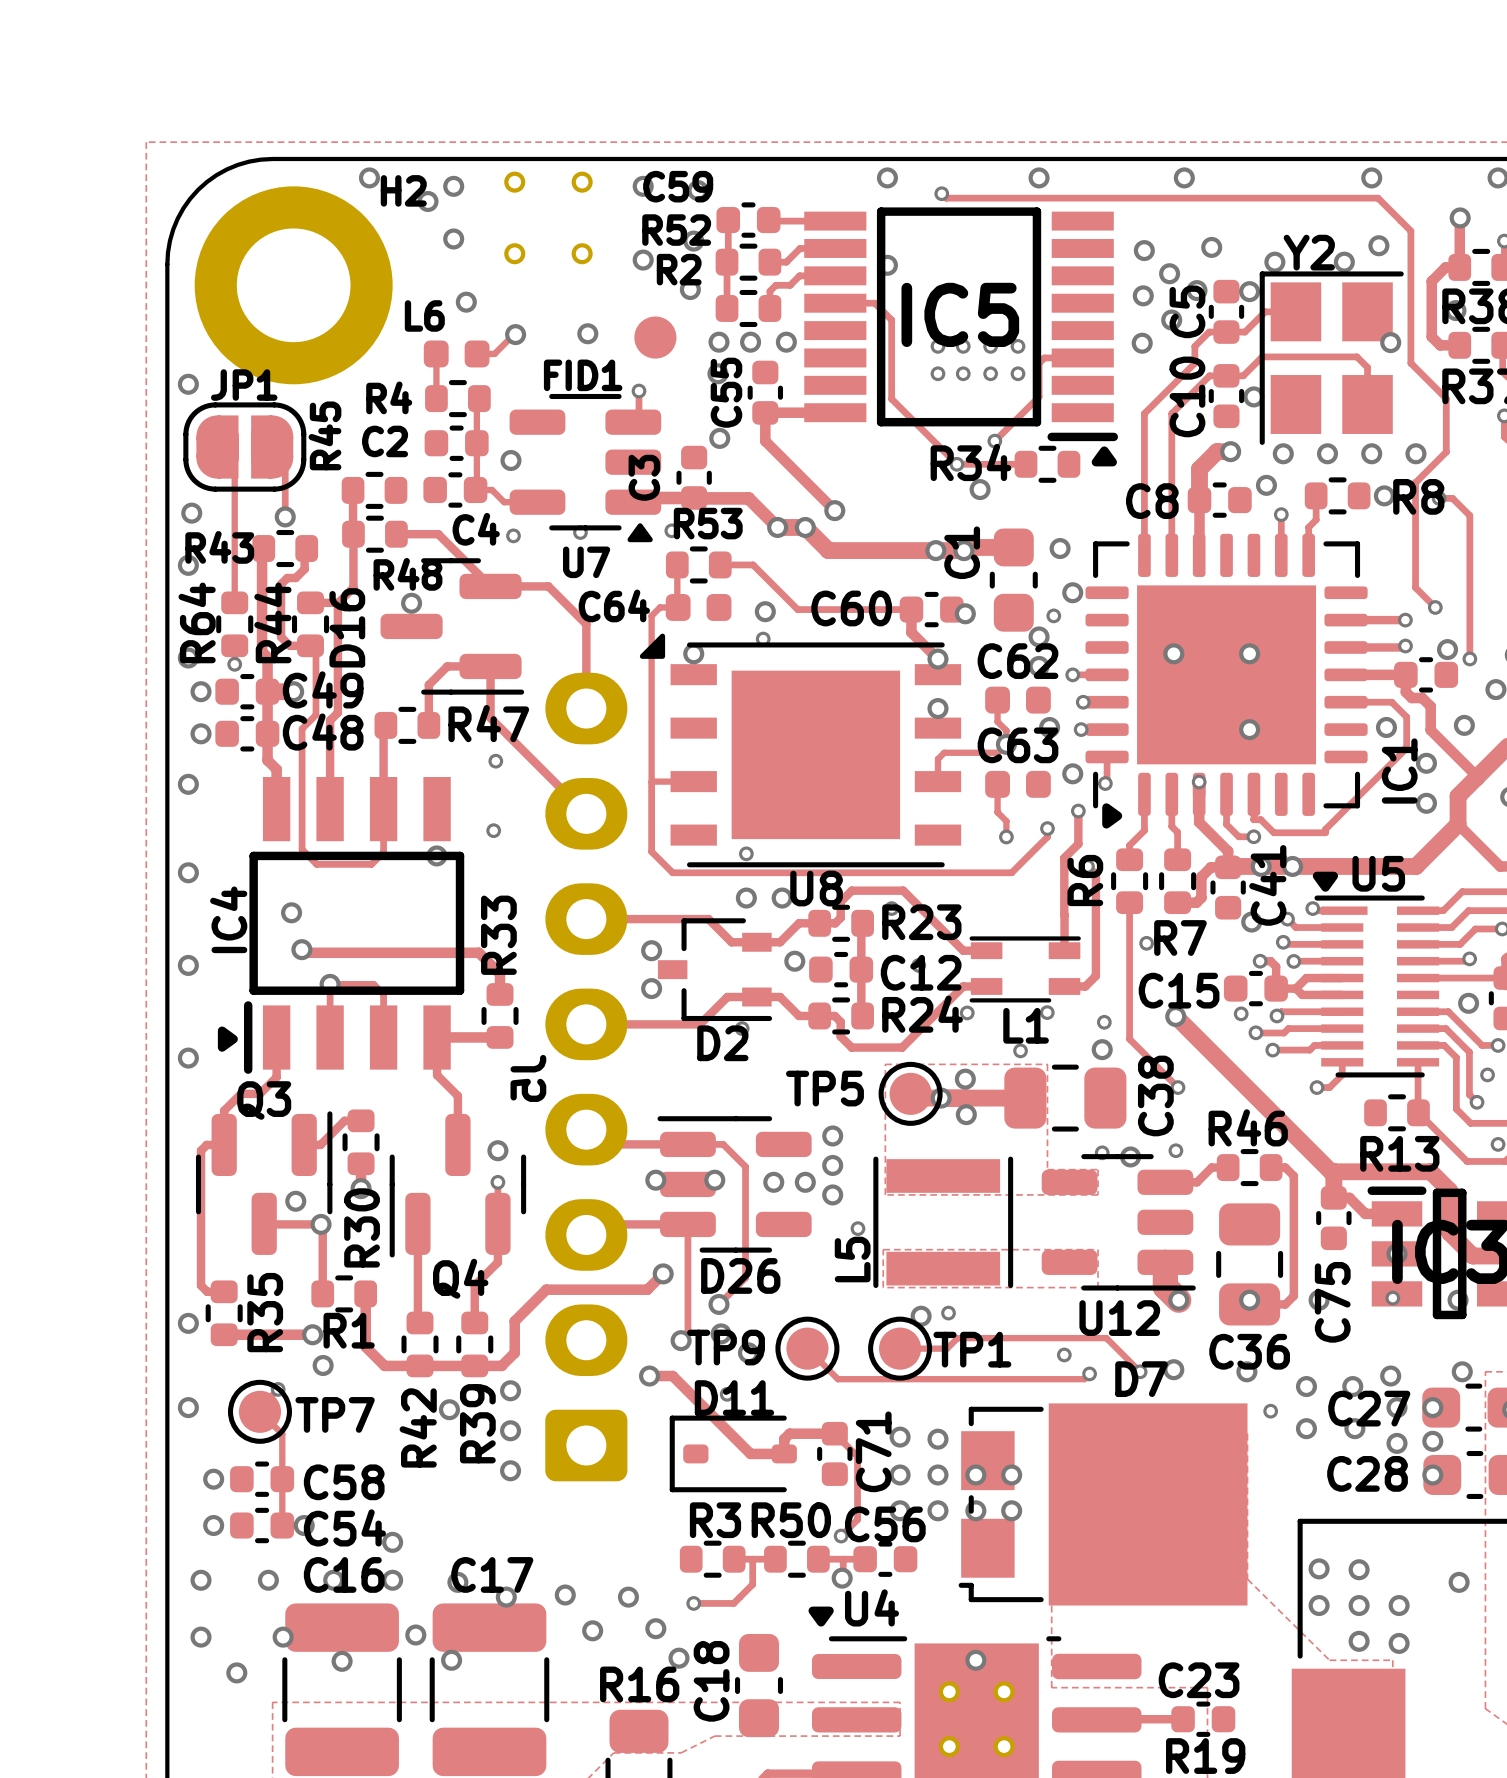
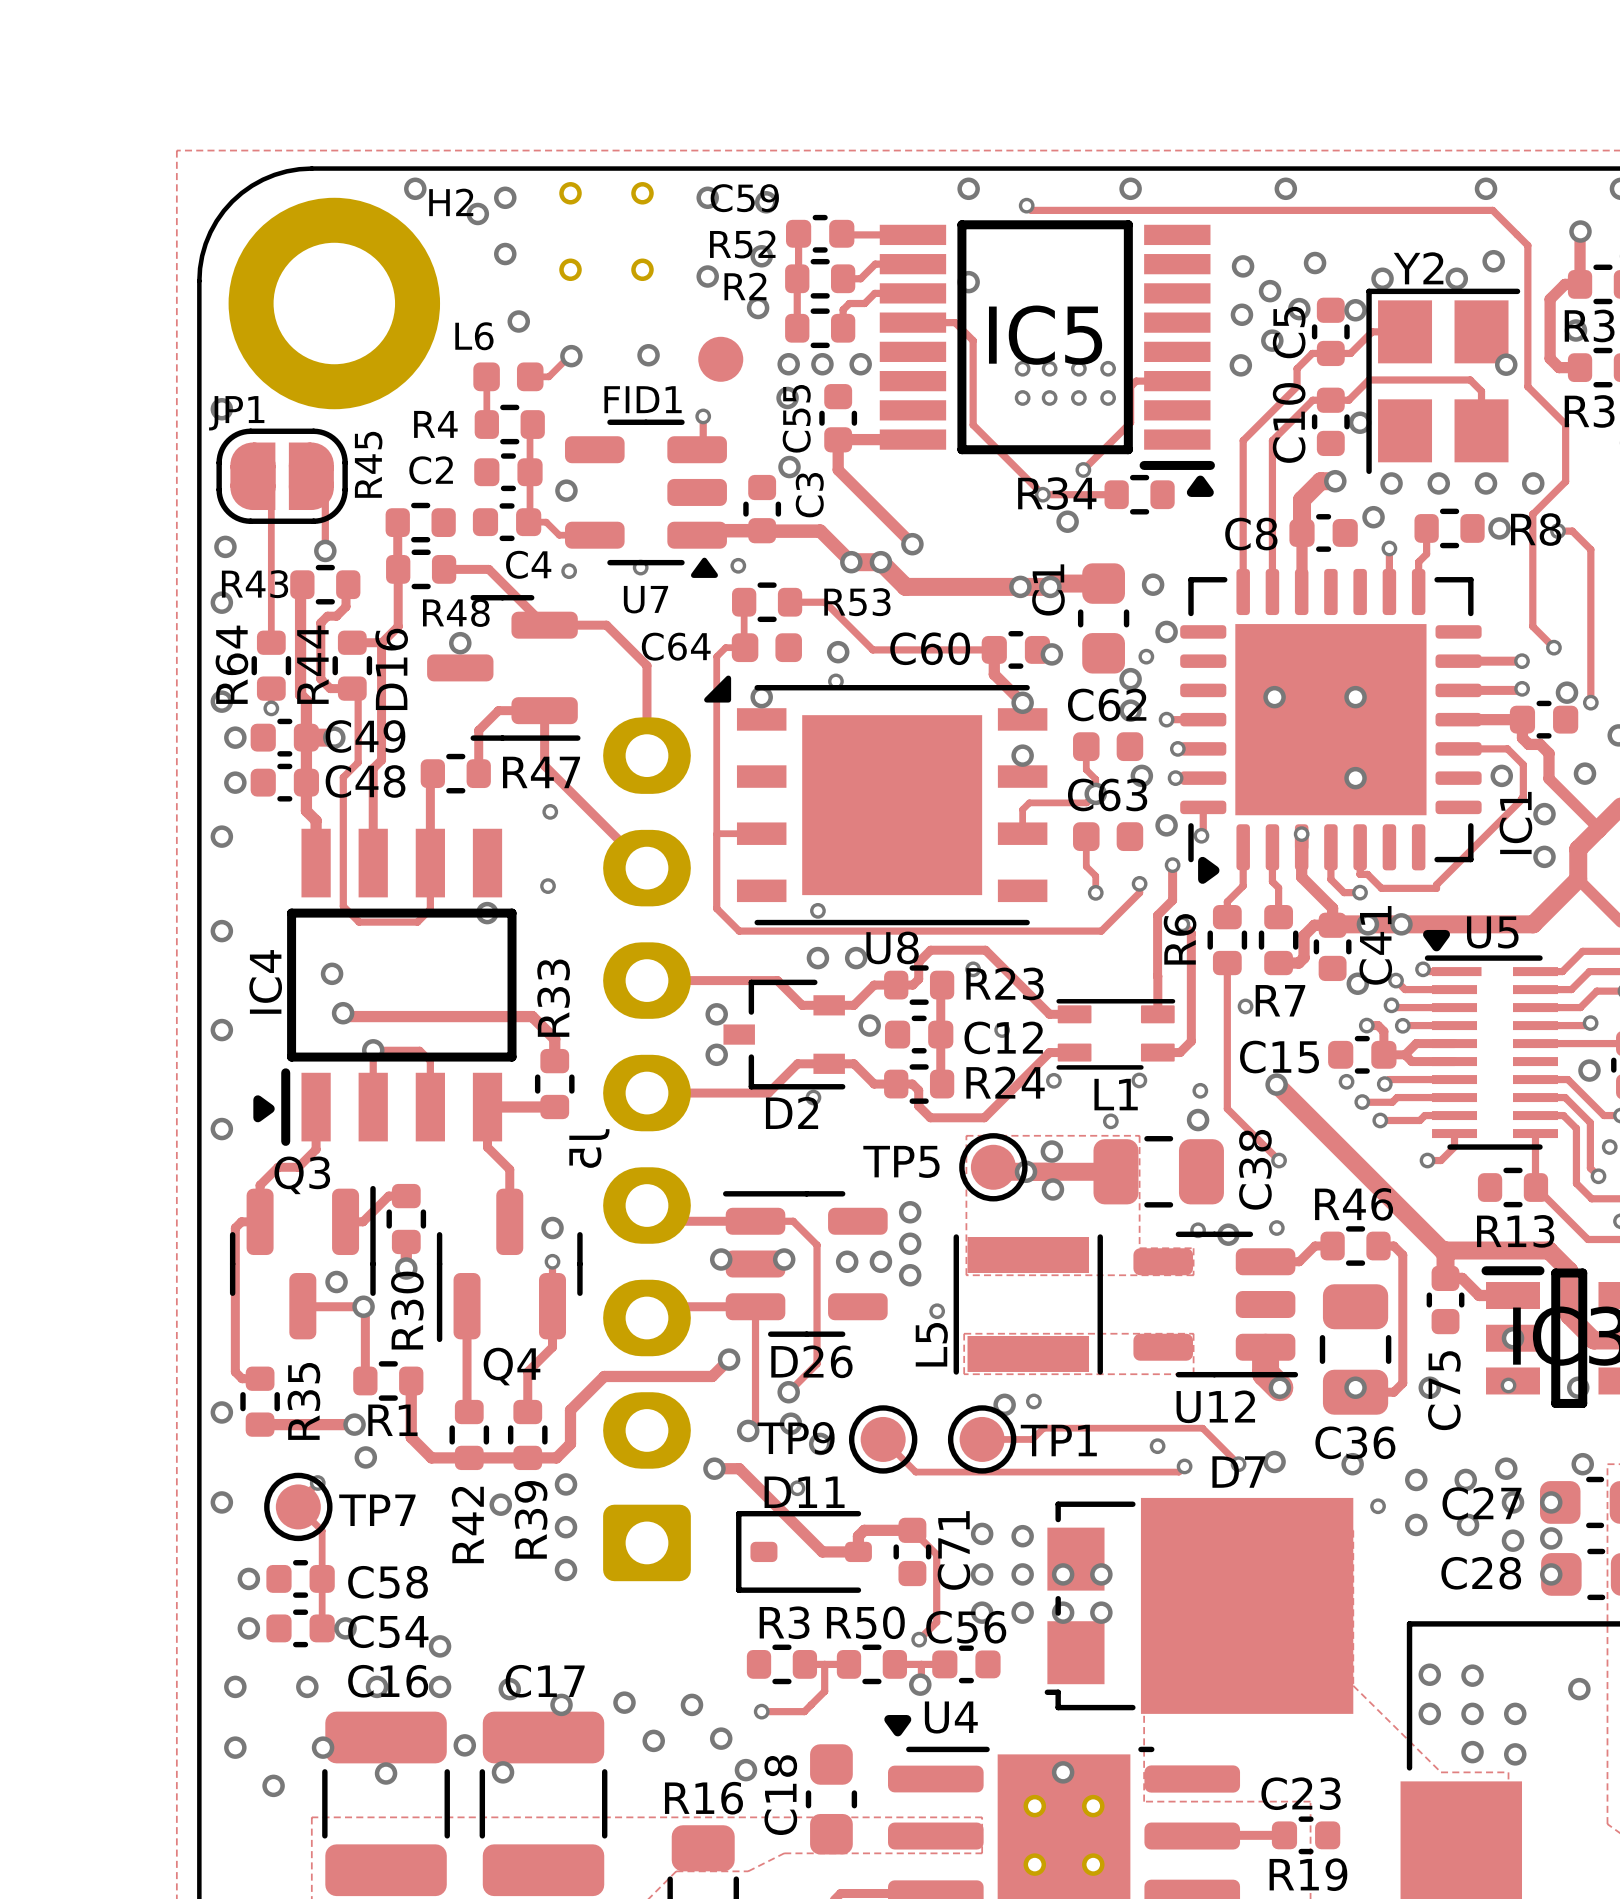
JP1 name position: JP1 (244, 385) -> JP1 (236, 413)
C3 name position: C3 (644, 477) -> C3 (809, 495)
R53 name position: R53 (708, 523) -> R53 (857, 602)

